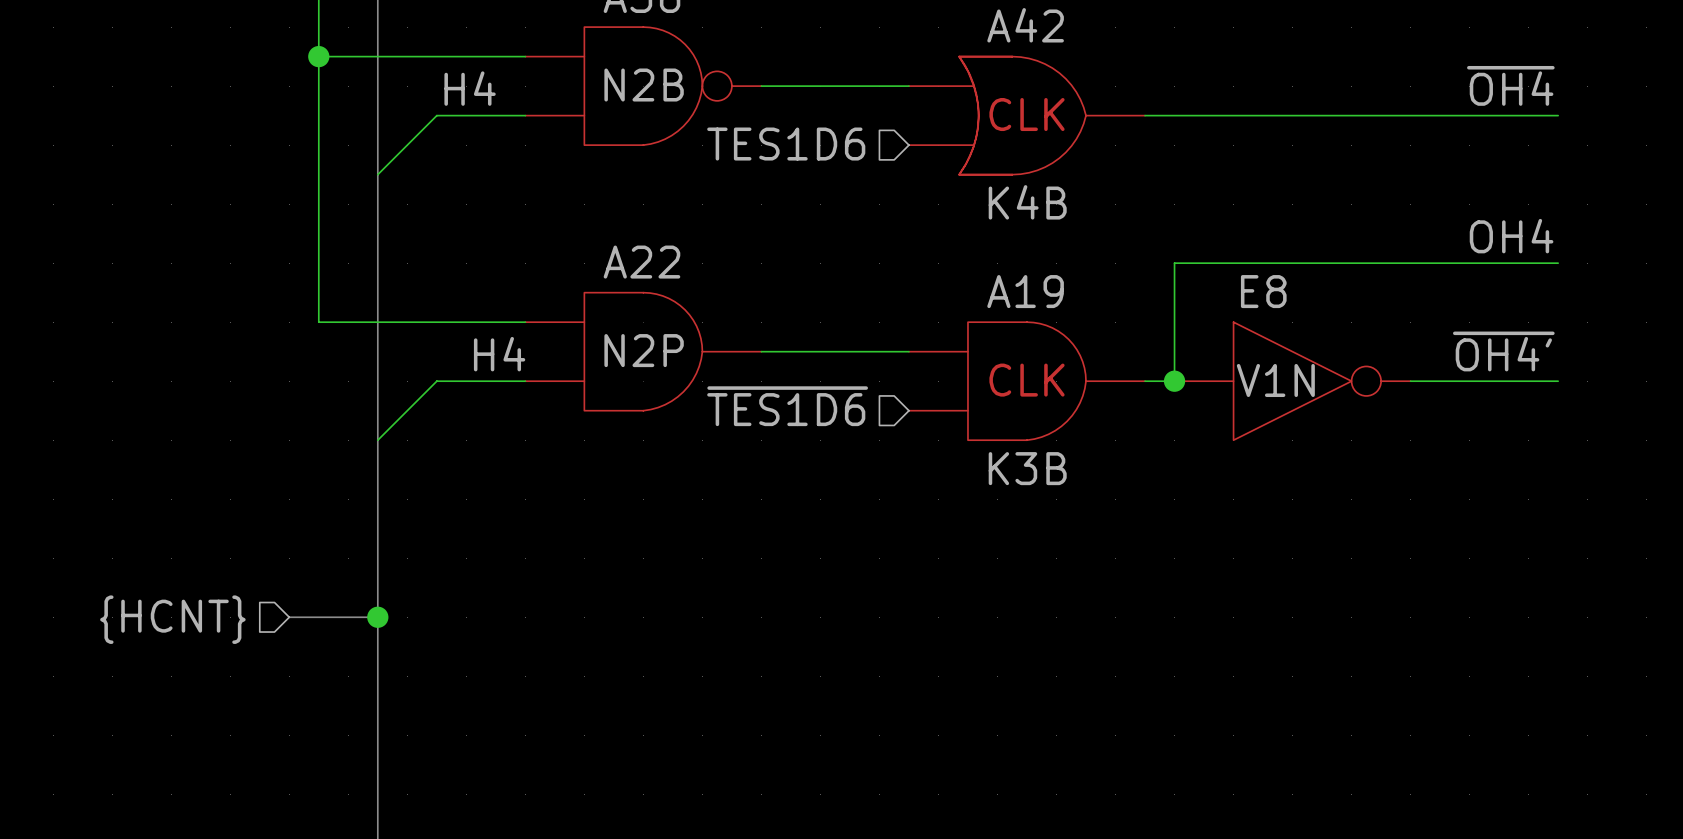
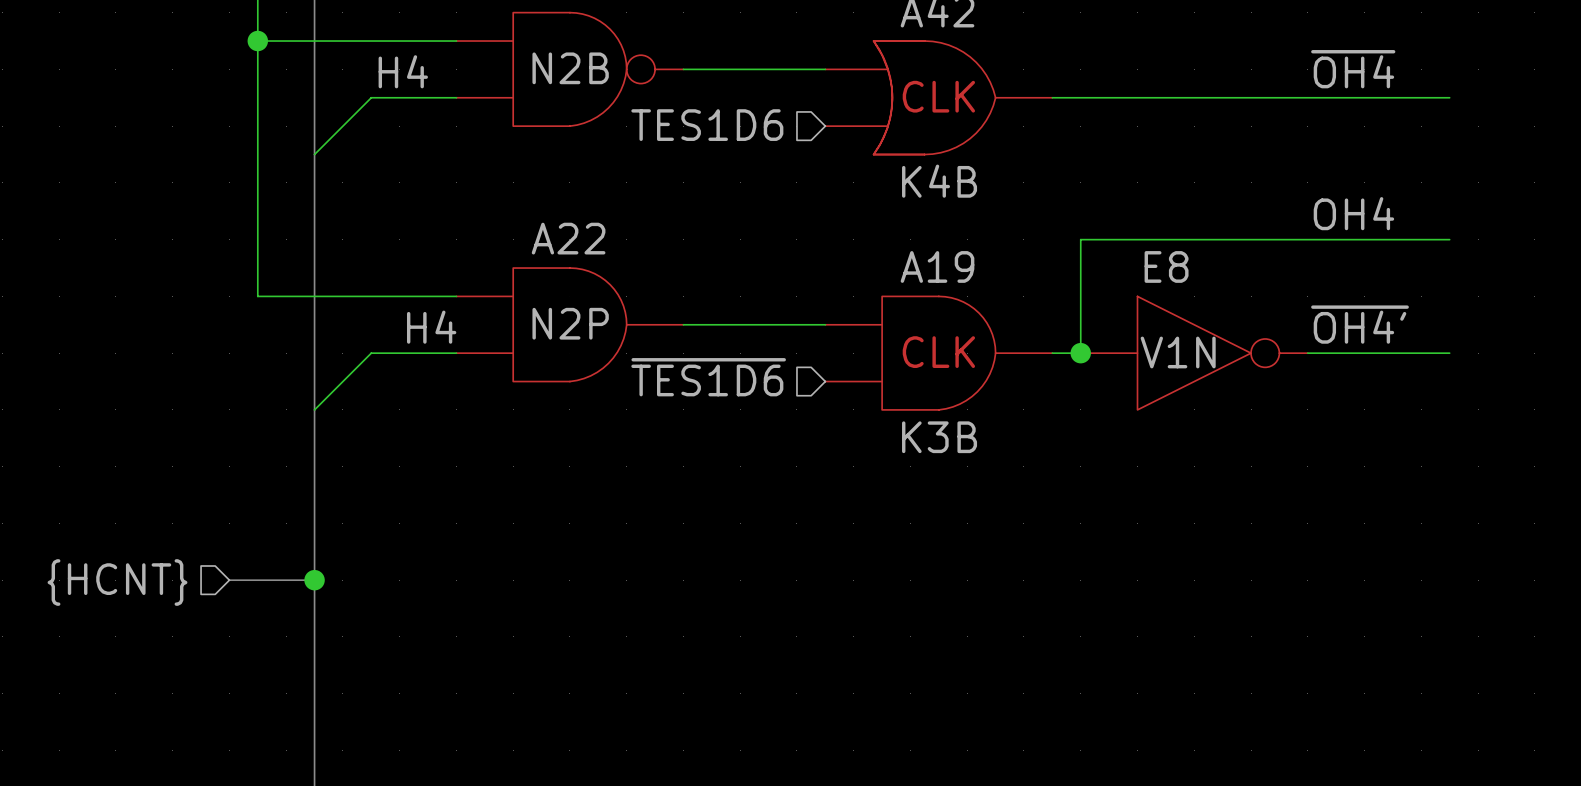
label position: ~{OH4} (1510, 85) -> ~{OH4} (1353, 69)
label position: OH4 (1511, 236) -> OH4 (1353, 213)
label position: ~{OH4'} (1503, 351) -> ~{OH4'} (1360, 324)

